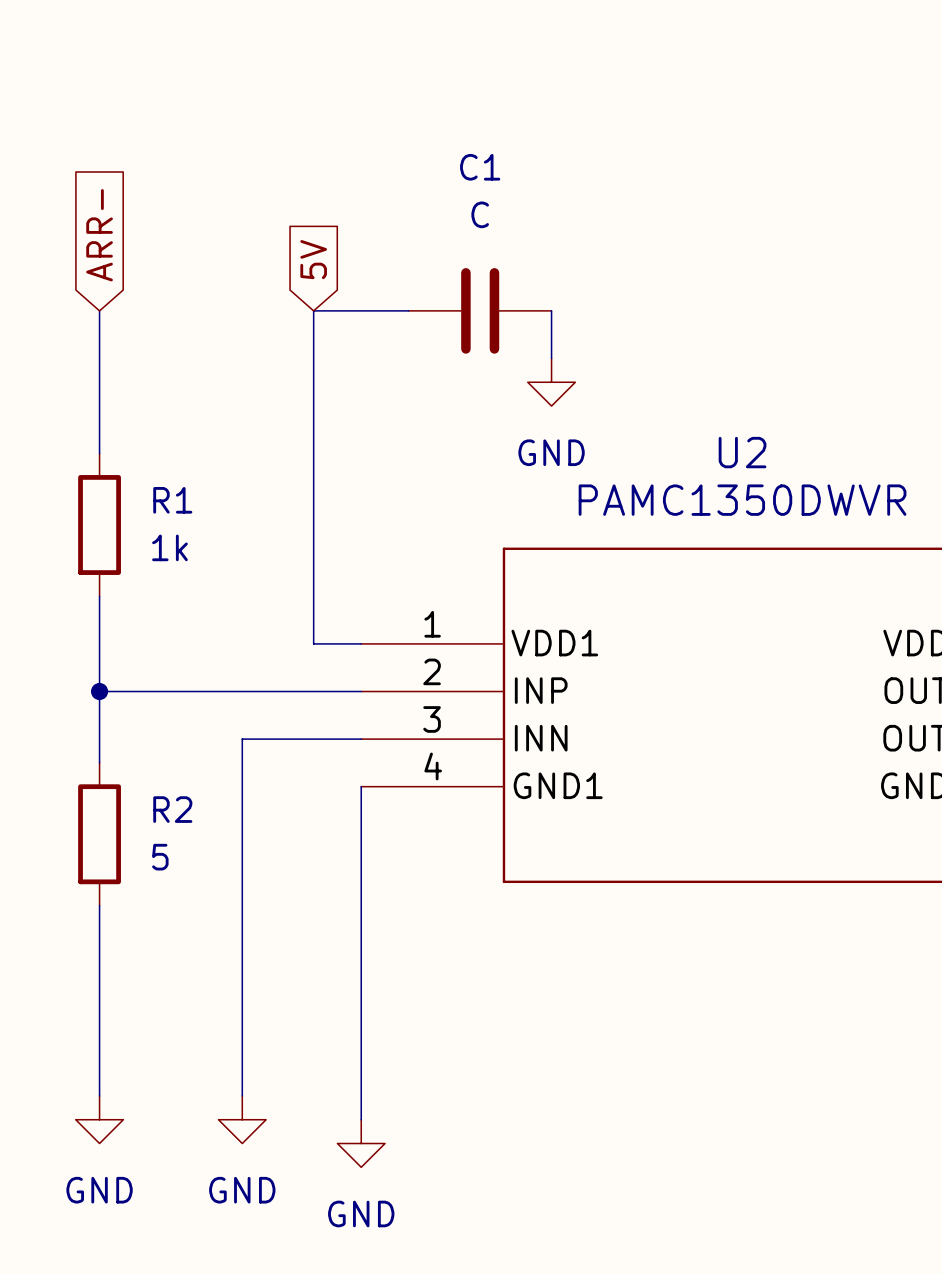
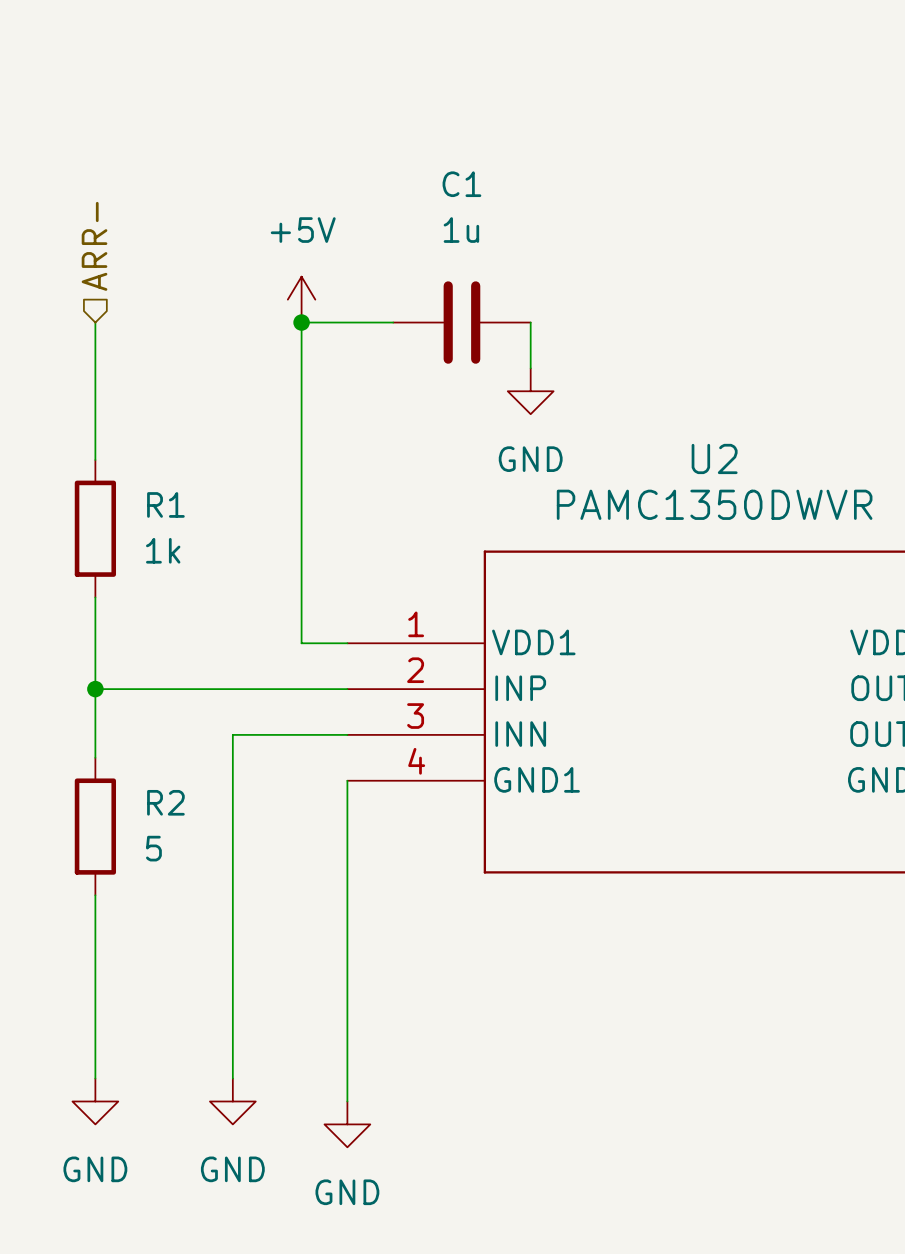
C1 value: C (480, 214) -> 1u (461, 230)
hierarchical label: none -> ARR- (94, 246)
global label: ARR- (99, 235) -> none
global label: 5V (313, 259) -> none
power symbol: none -> +5V (301, 299)
junction: none -> (301, 322)

